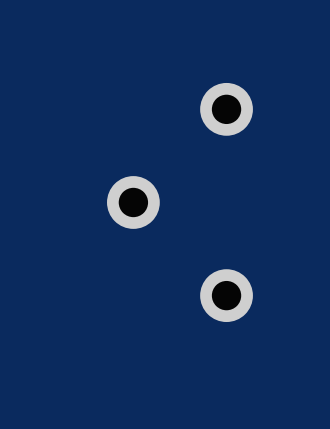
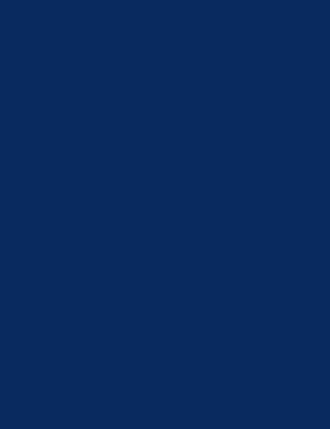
part: (179, 202) -> none

